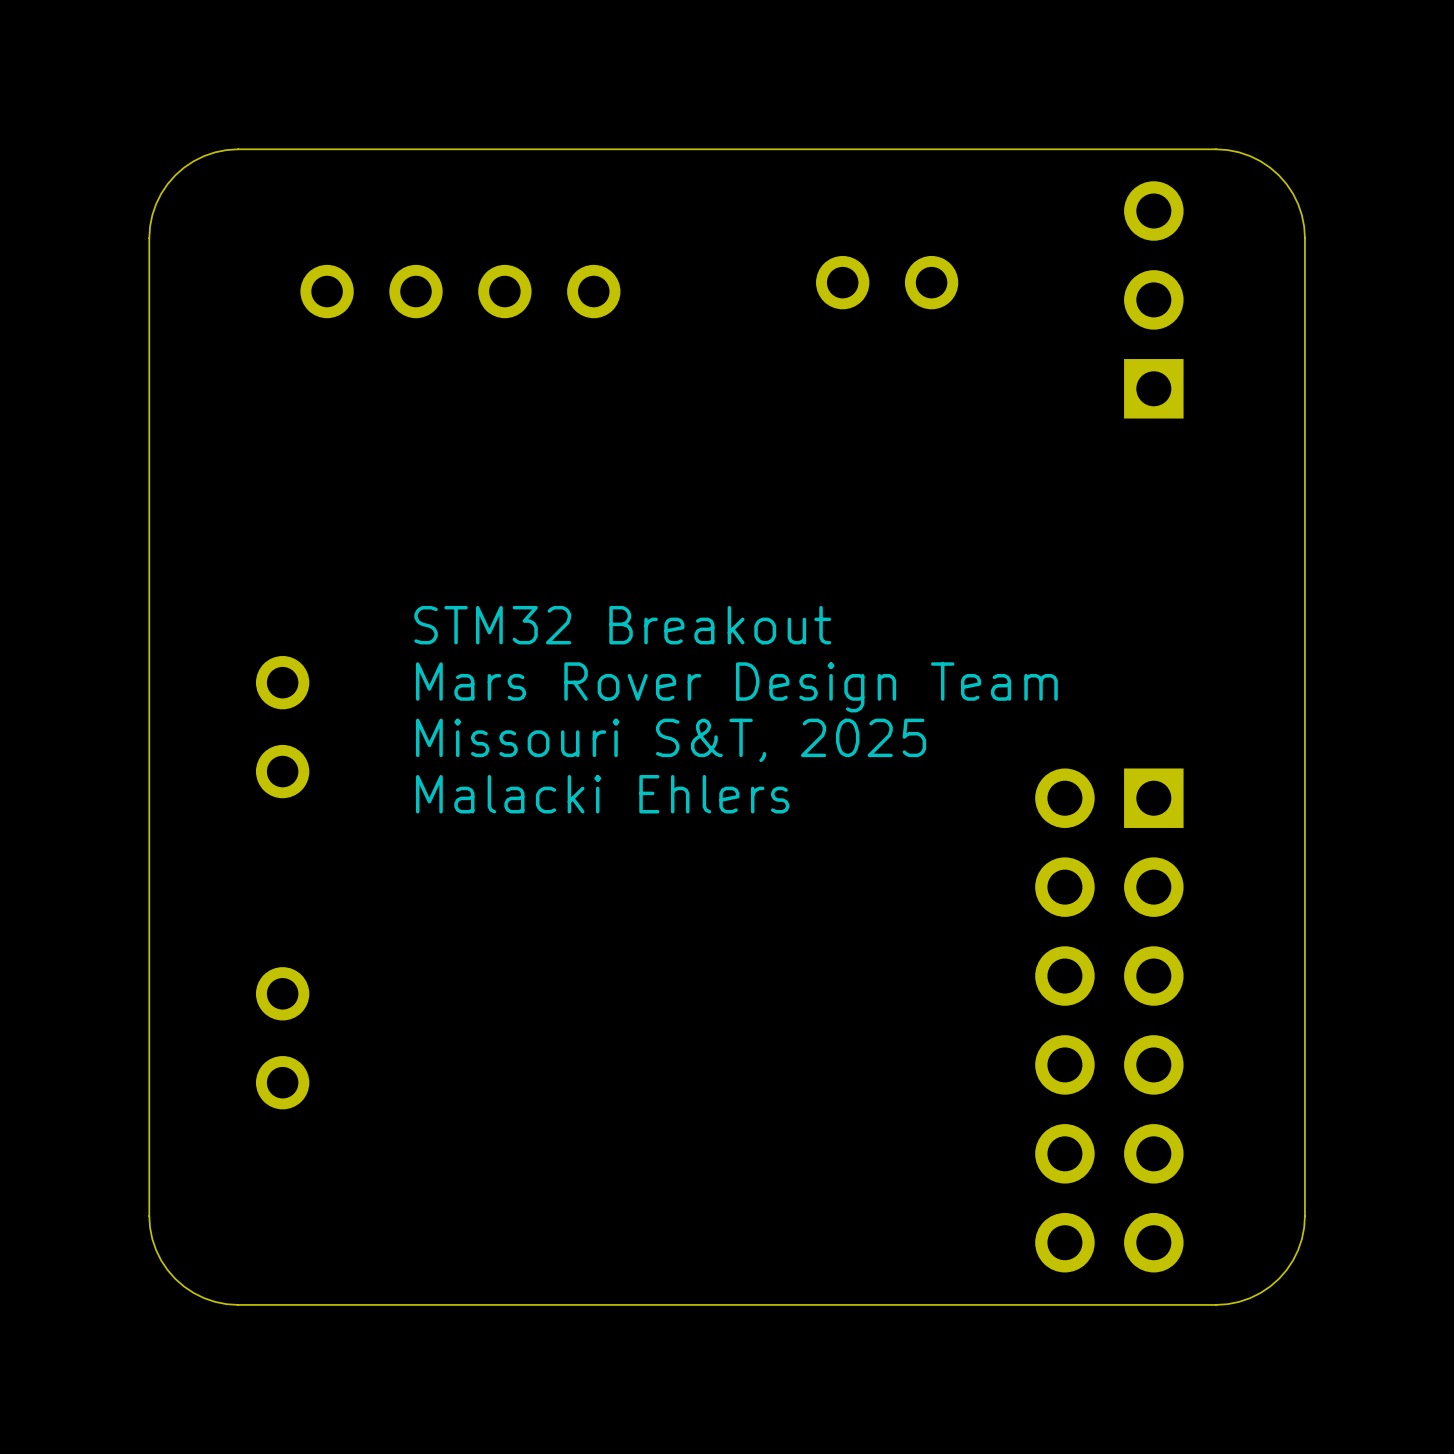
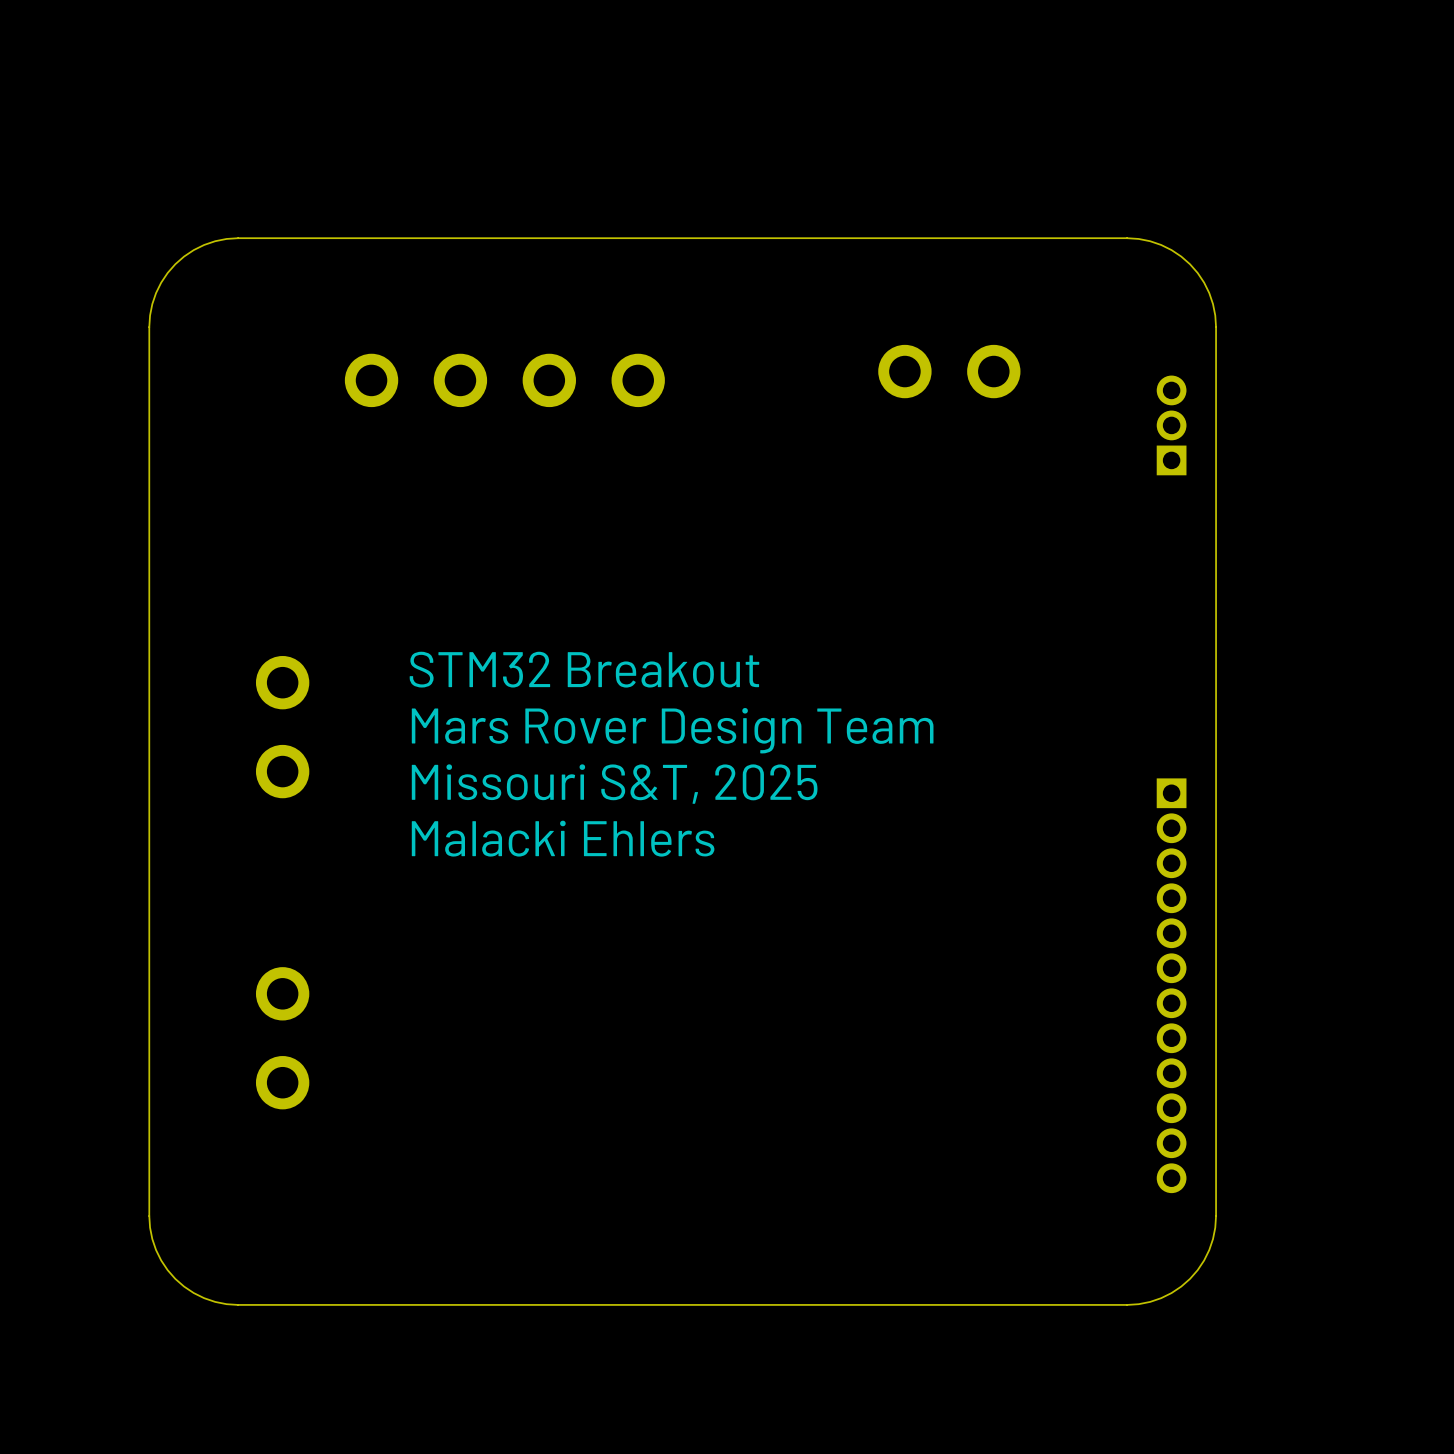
part position: (887, 282) -> (949, 371)
part position: (460, 291) -> (504, 380)
part: (1153, 299) -> none
board edge: (149, 327) (149, 238) (152, 215) (156, 204) (167, 184) (184, 167) (204, 156) (226, 150) (1216, 149) (1239, 152) (1250, 156) (1260, 161) (1278, 175) (1286, 184) (1298, 204) (1304, 226) (1304, 238) (1304, 1227) (1298, 1250) (1286, 1270) (1270, 1286) (1250, 1298) (1227, 1304) (1216, 1304) (1127, 1304) -> (149, 327) (150, 315) (156, 293) (161, 282) (175, 264) (193, 250) (204, 244) (226, 238) (238, 238) (1127, 238) (1138, 238) (1161, 244) (1171, 250) (1190, 264) (1197, 272) (1209, 293) (1213, 304) (1216, 327) (1216, 1216) (1213, 1239) (1209, 1250) (1197, 1270) (1190, 1278) (1171, 1293) (1161, 1298) (1138, 1304) (1127, 1304)
part: none -> (1171, 425)
text position: STM32 Breakout (622, 625) -> STM32 Breakout (584, 669)
text position: Mars Rover Design Team (736, 687) -> Mars Rover Design Team (672, 730)
text position: Missouri S&T, 2025 (671, 740) -> Missouri S&T, 2025 (614, 784)
text position: Malacki Ehlers (602, 794) -> Malacki Ehlers (563, 838)
part: none -> (1171, 985)
part: (1109, 1020) -> none

